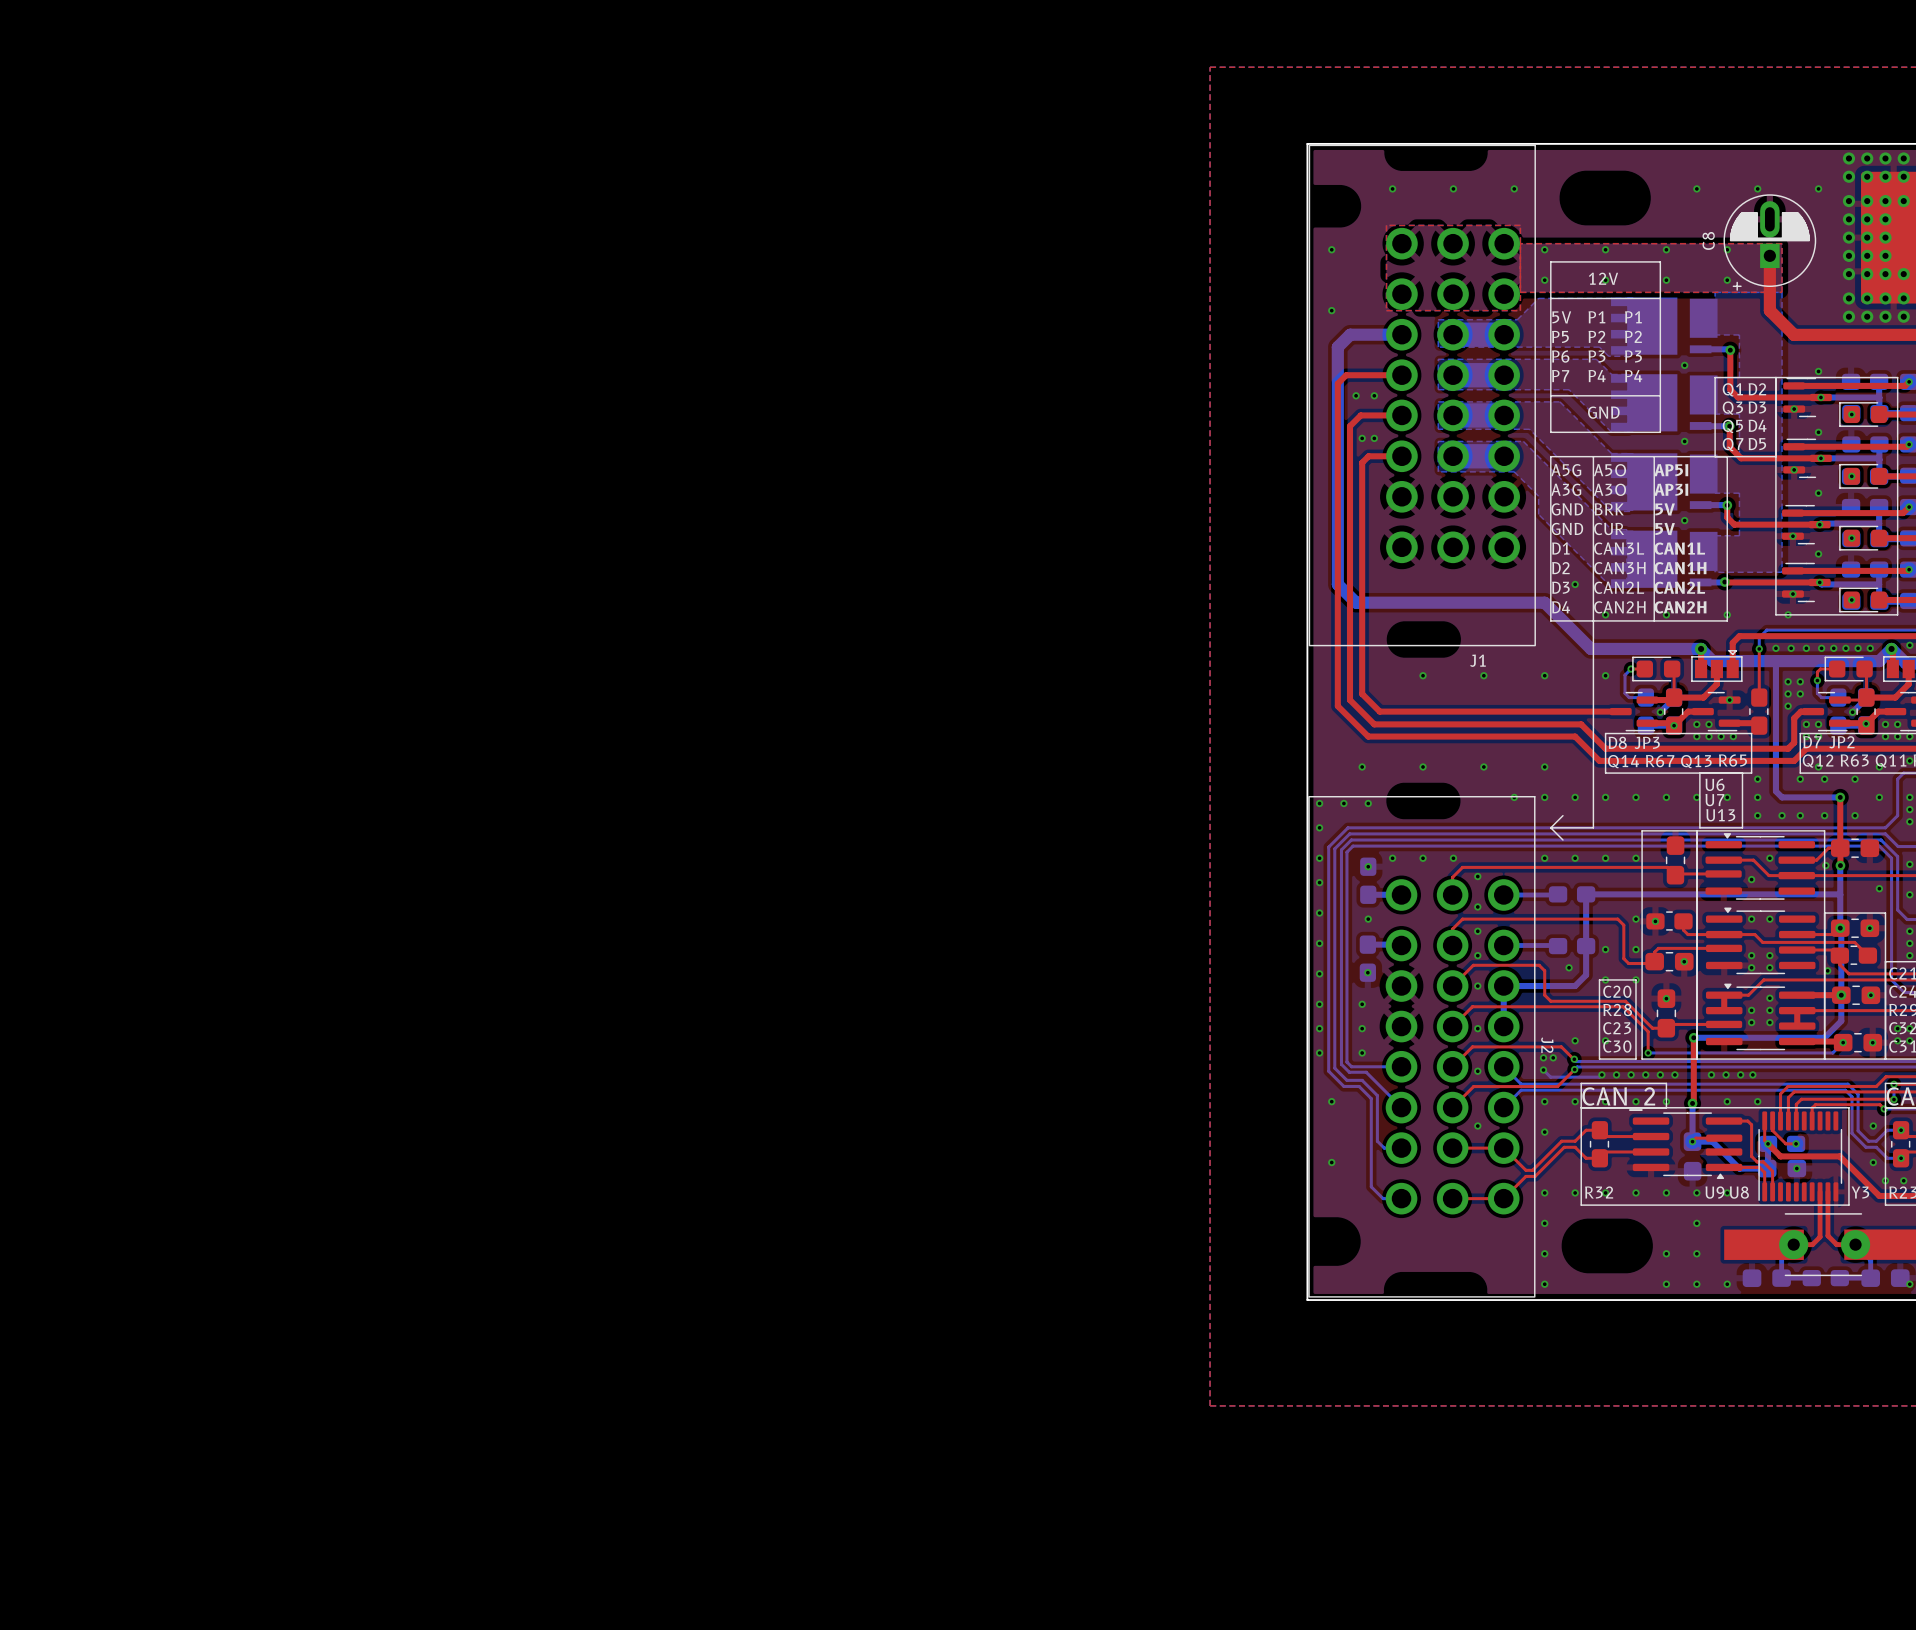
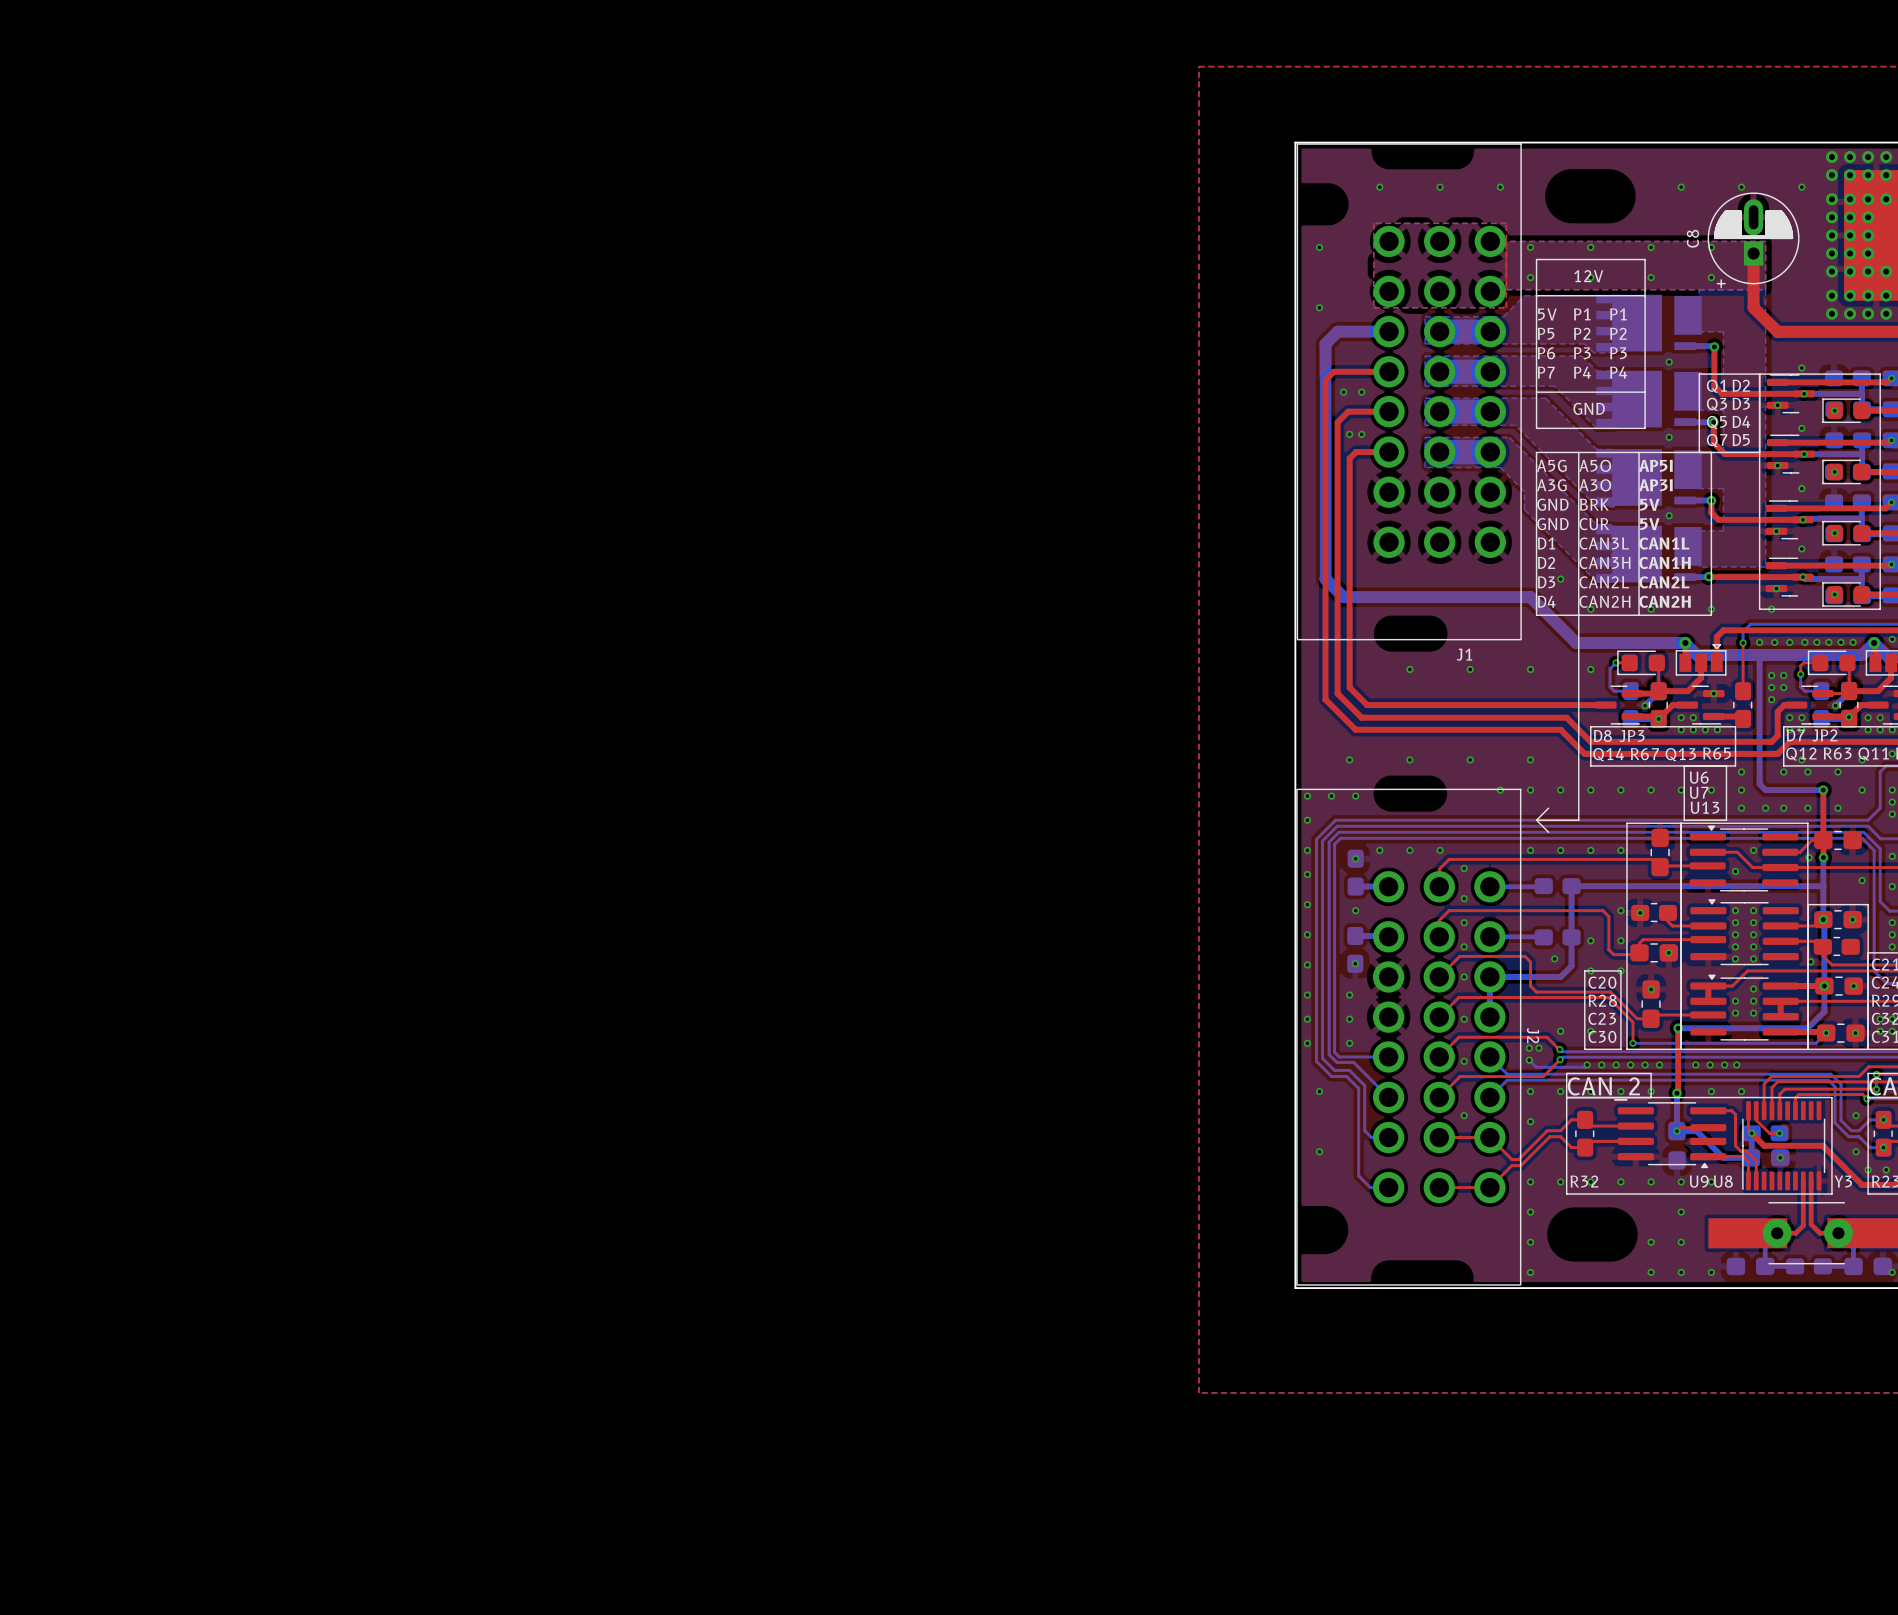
via: none -> (1735, 922)
via: none -> (1753, 922)
top track: (1724, 934) (1754, 934) (1762, 942) (1854, 942) (1867, 955) -> none
via: none -> (1735, 934)
via: none -> (1753, 934)

